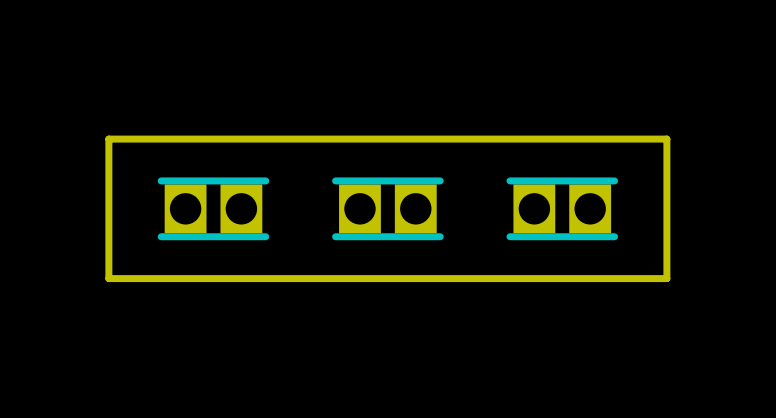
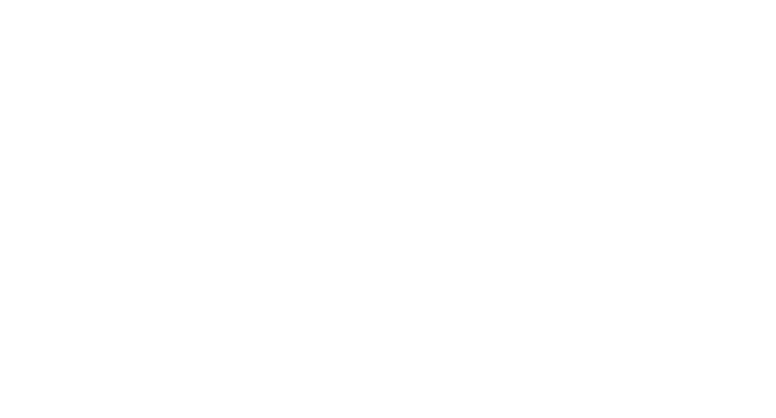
board edge: (108, 139) (108, 278) (666, 278) (666, 139) (108, 139) -> none
part: (213, 208) -> none
part: (387, 208) -> none
part: (562, 208) -> none

